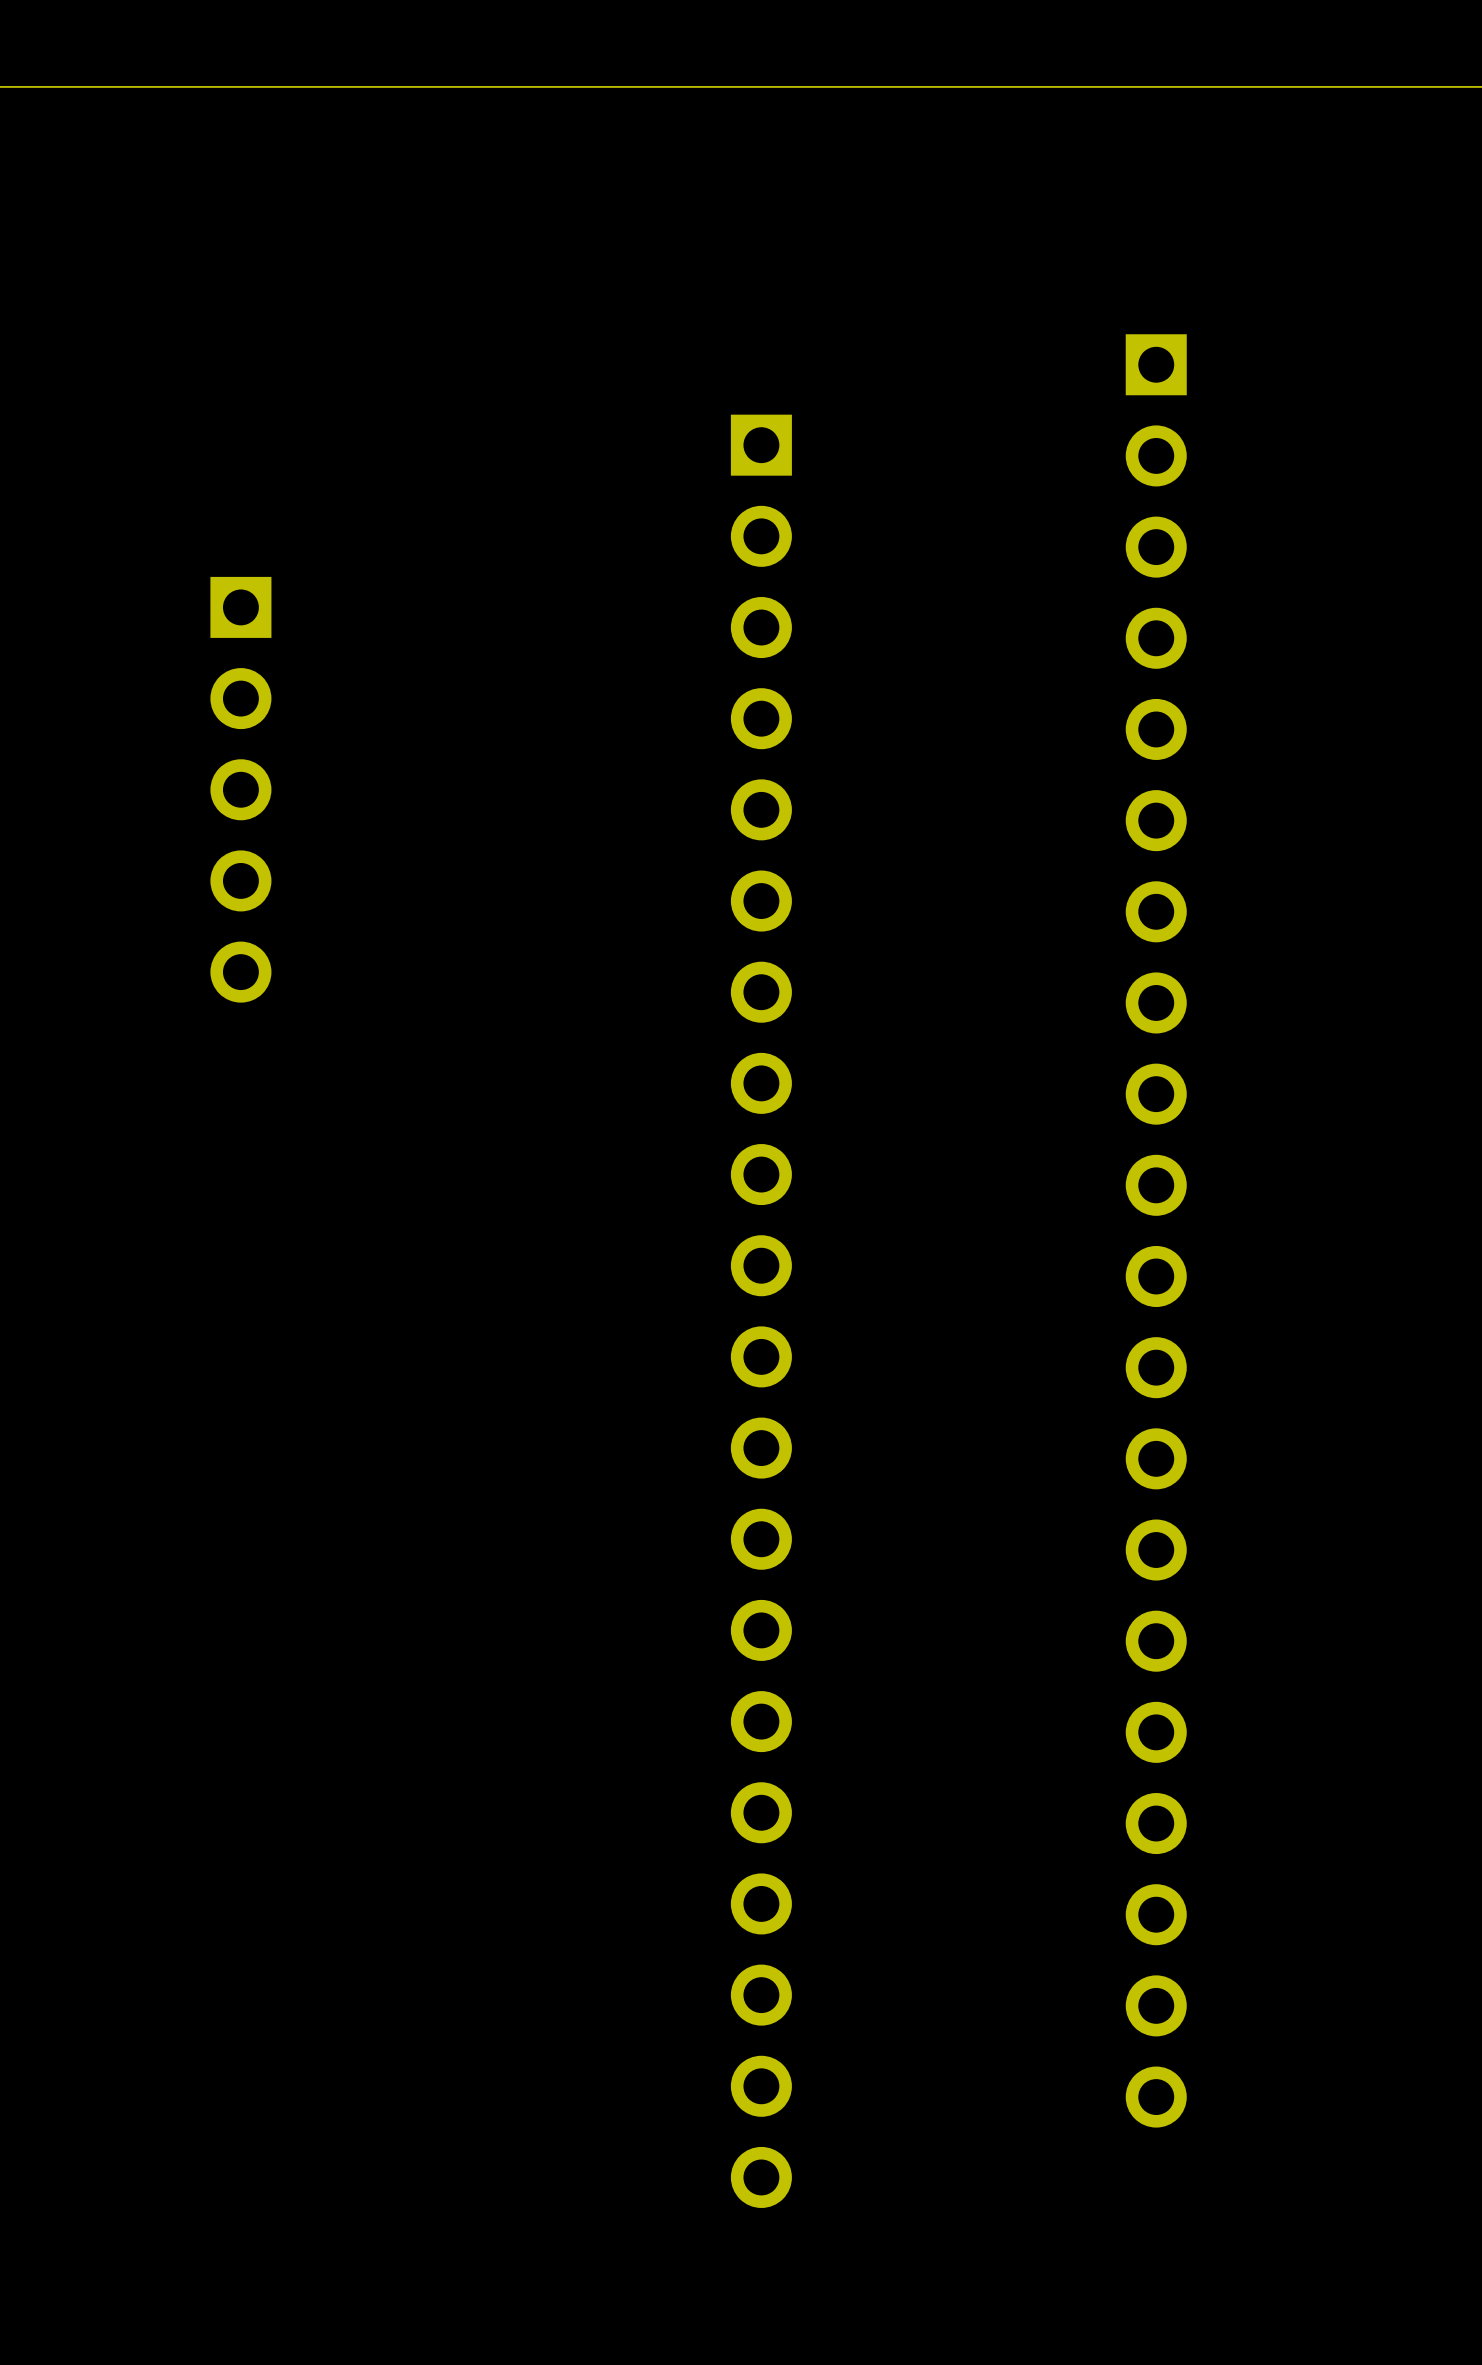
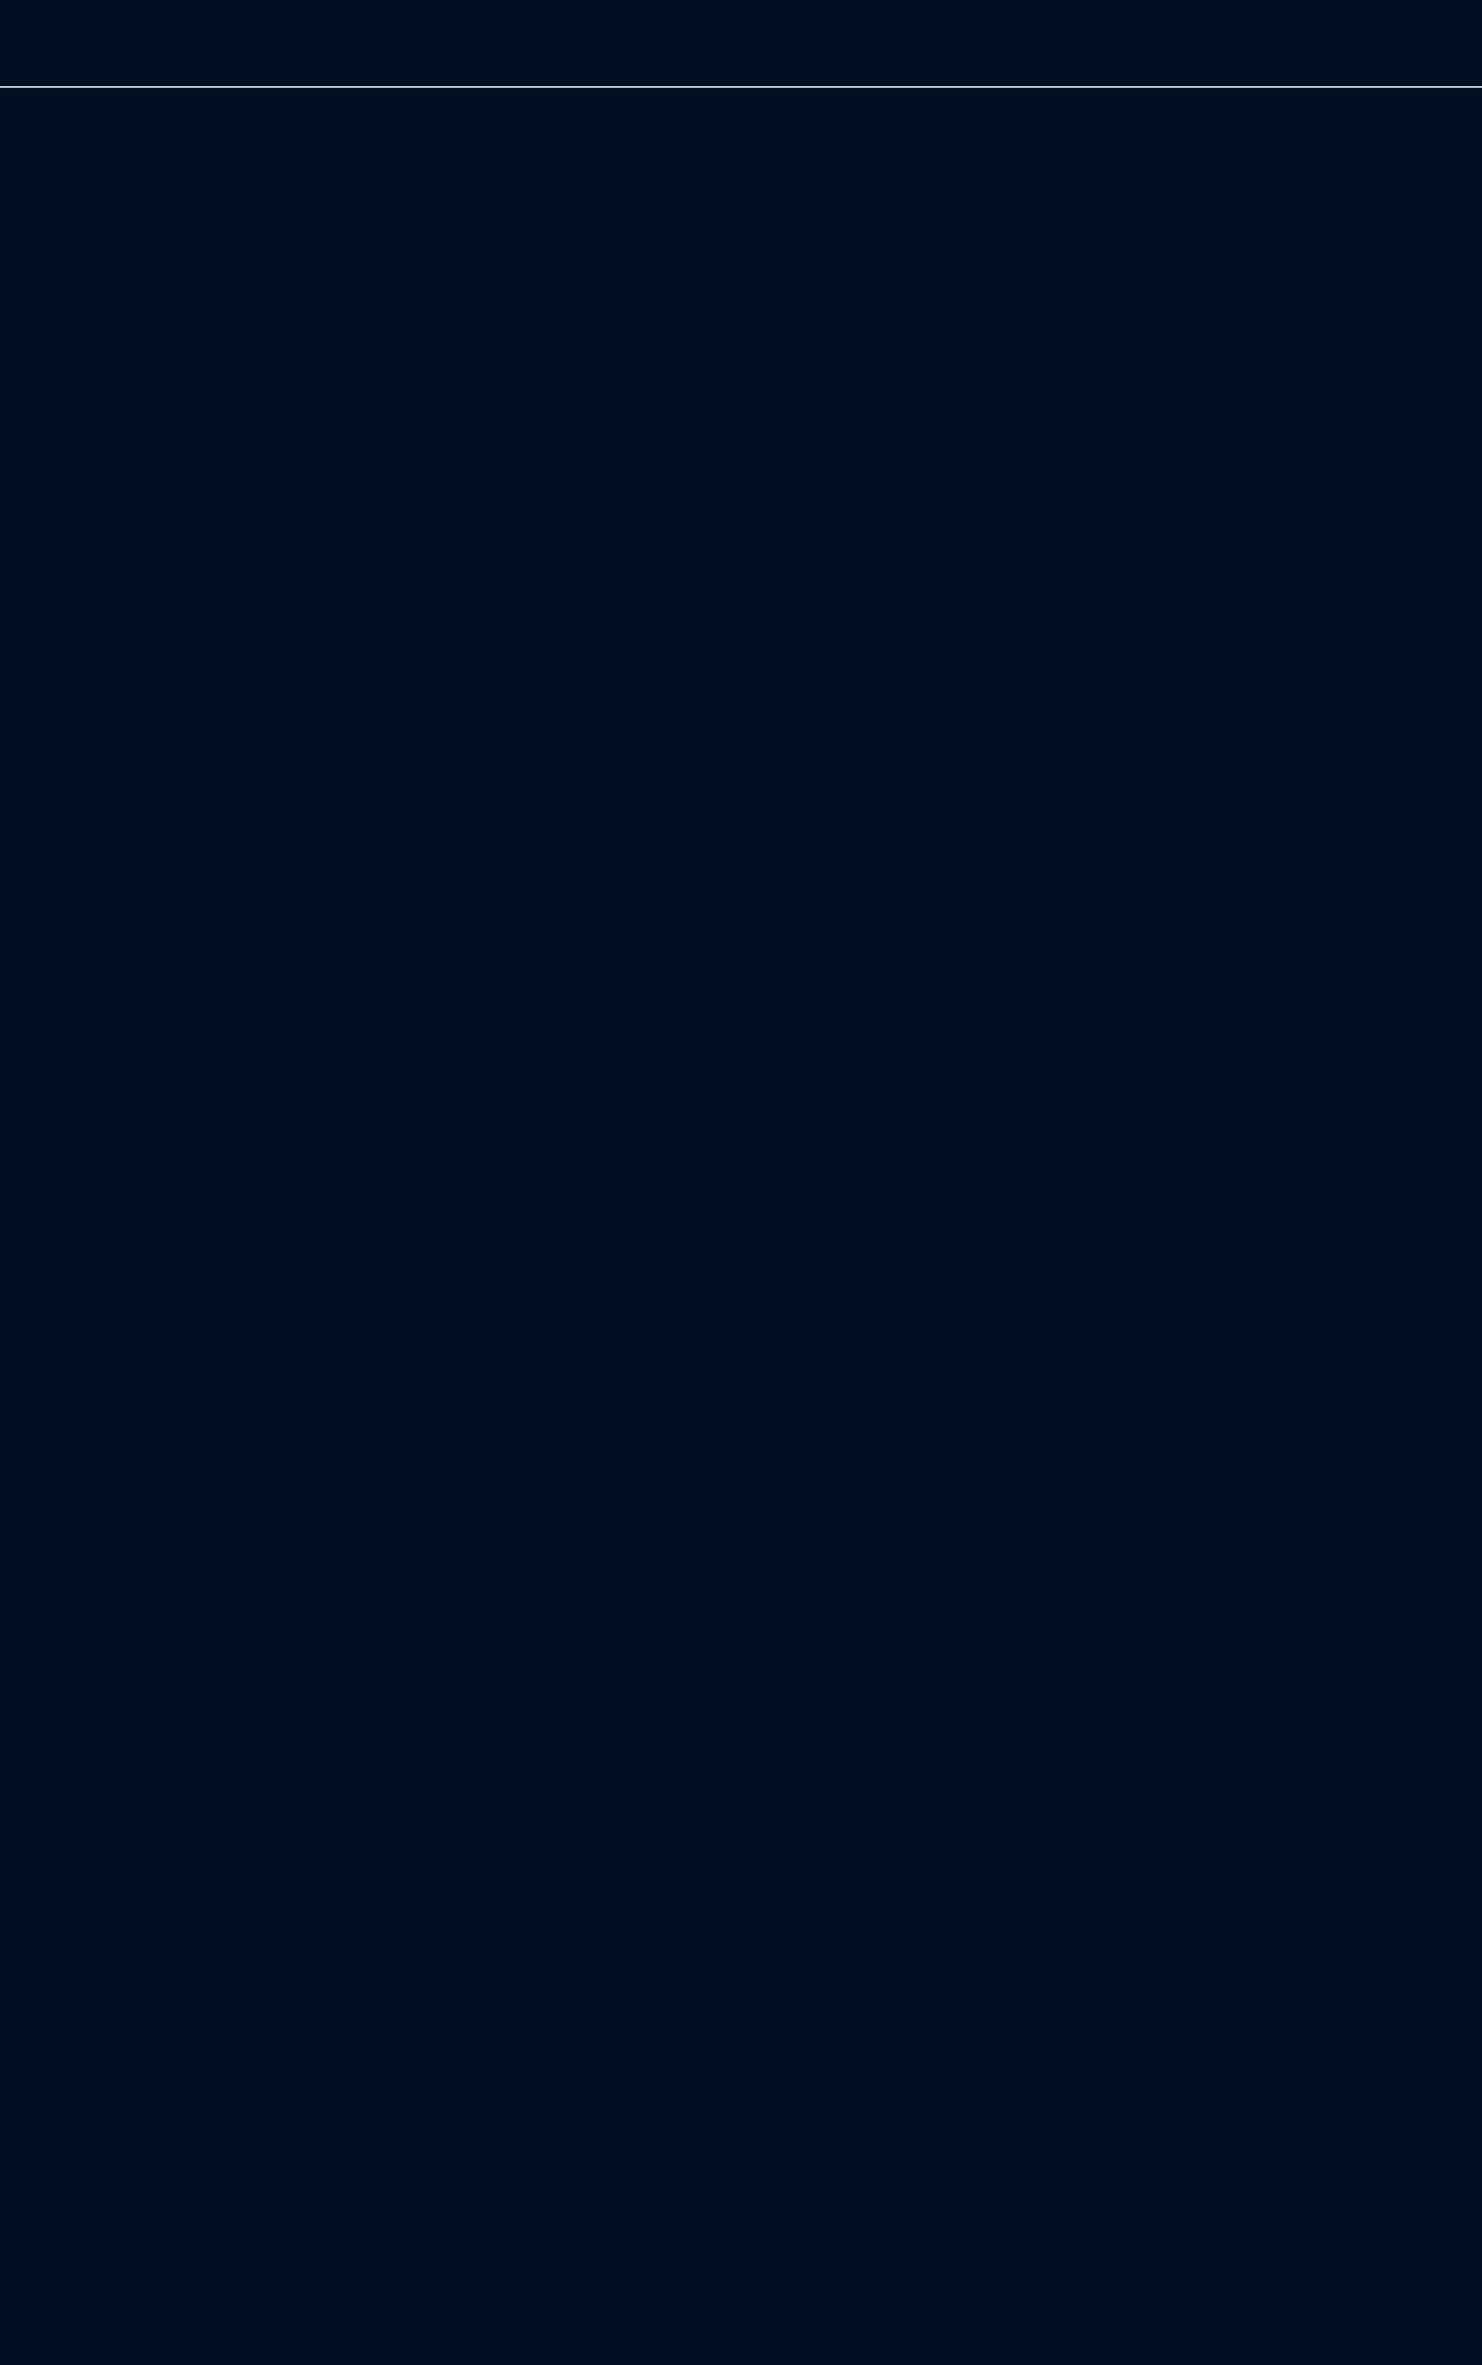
part: (240, 789) -> none
part: (1156, 1230) -> none
part: (761, 1311) -> none

